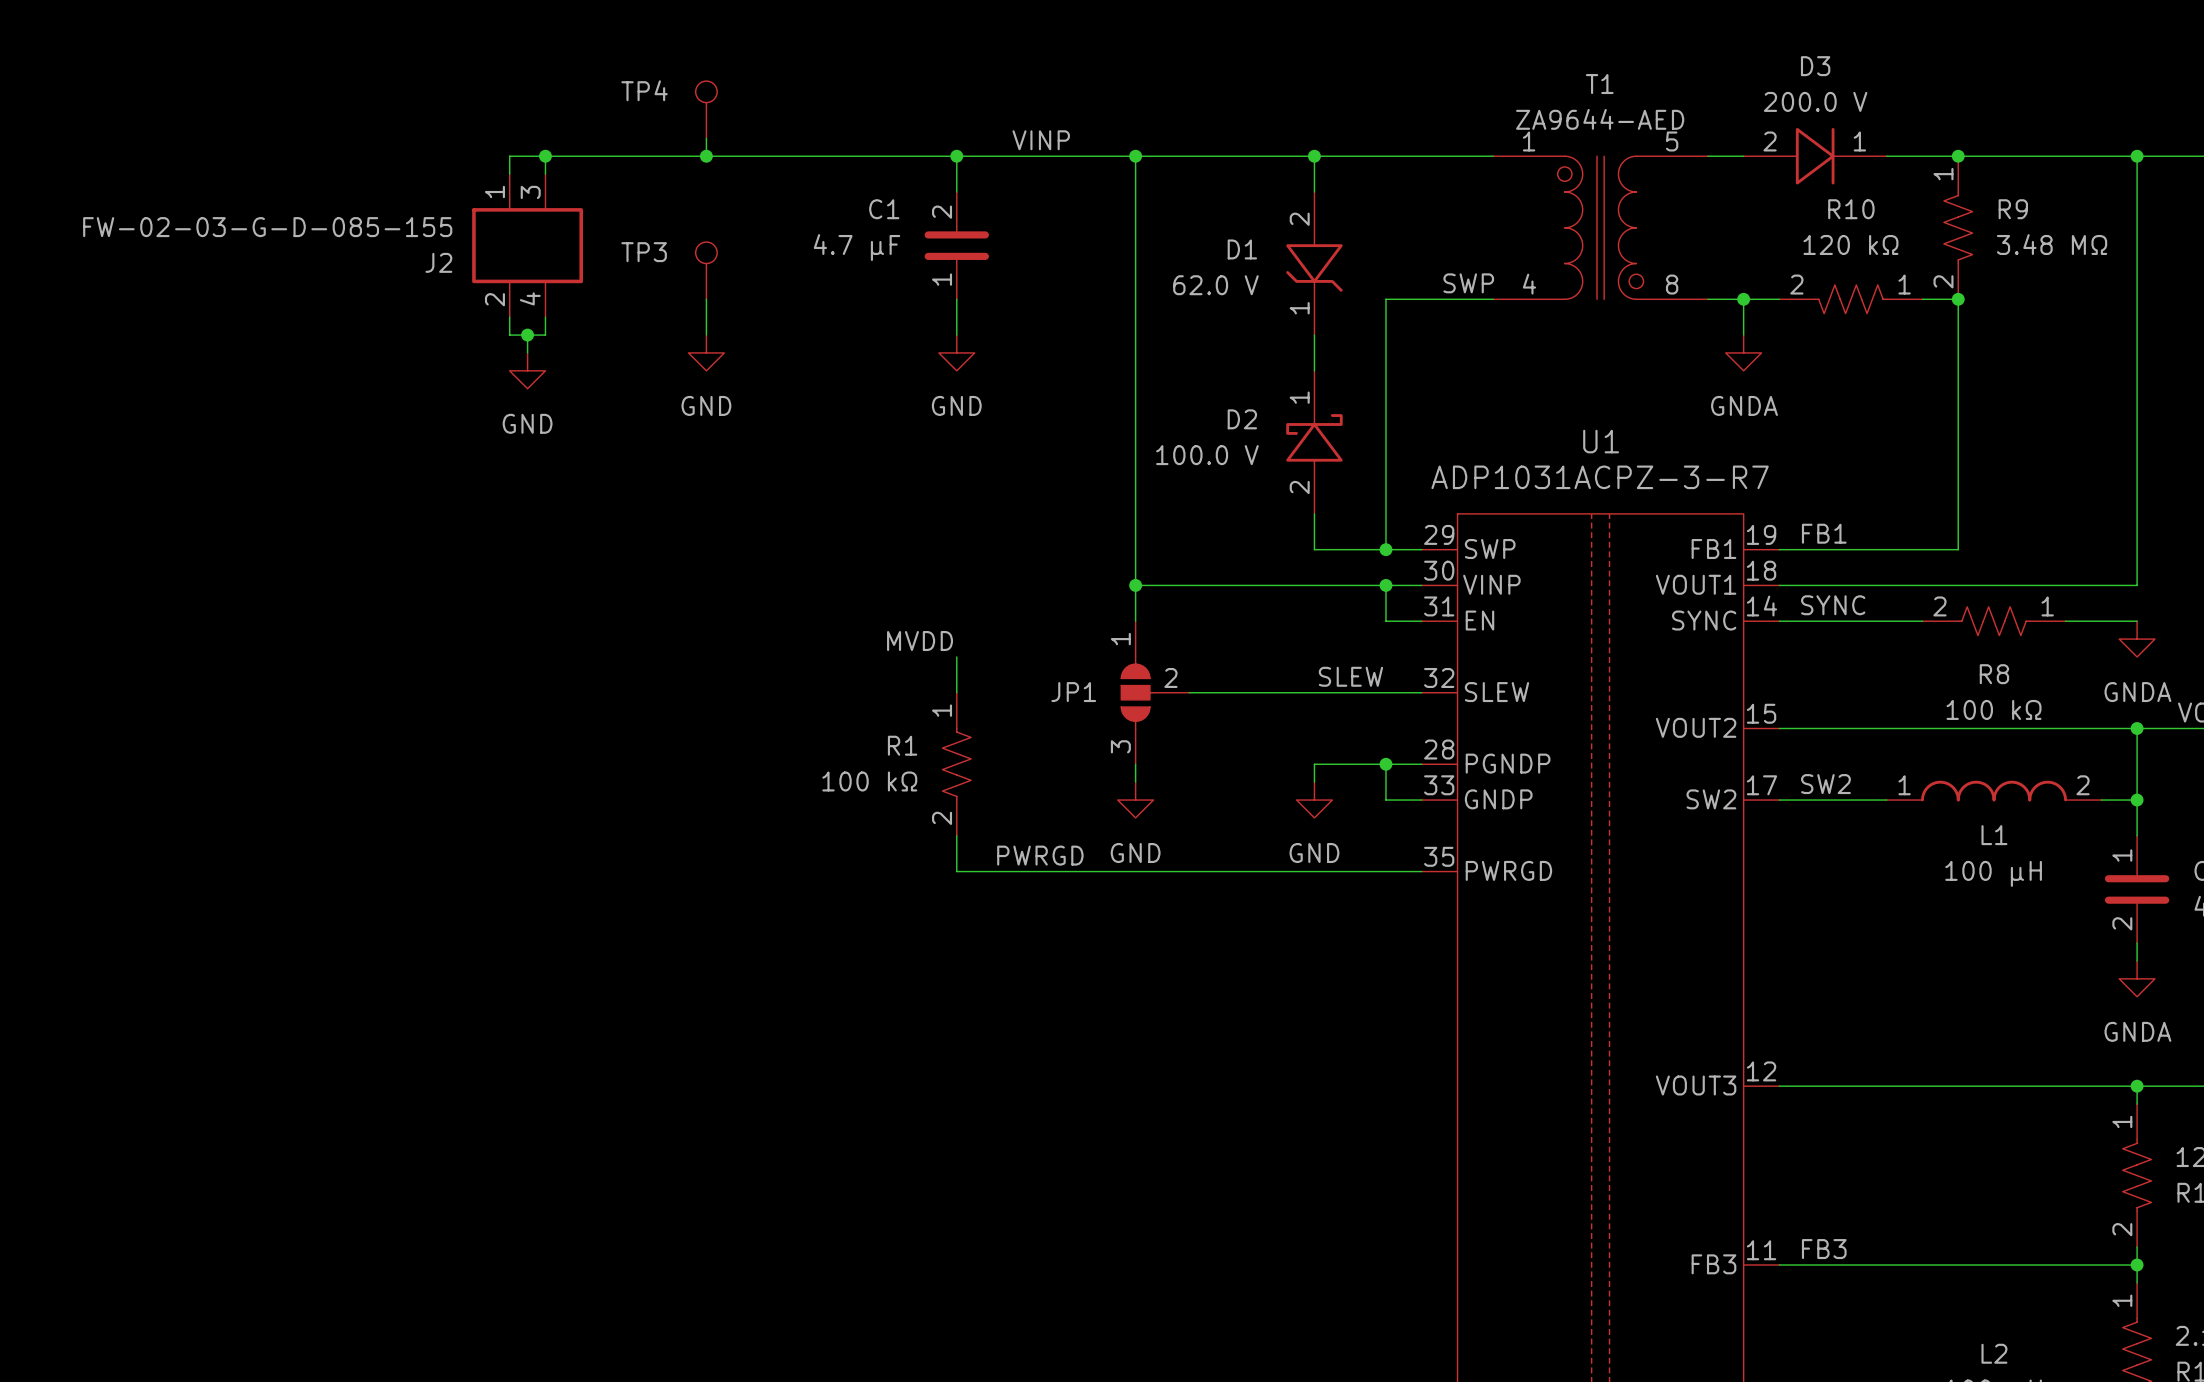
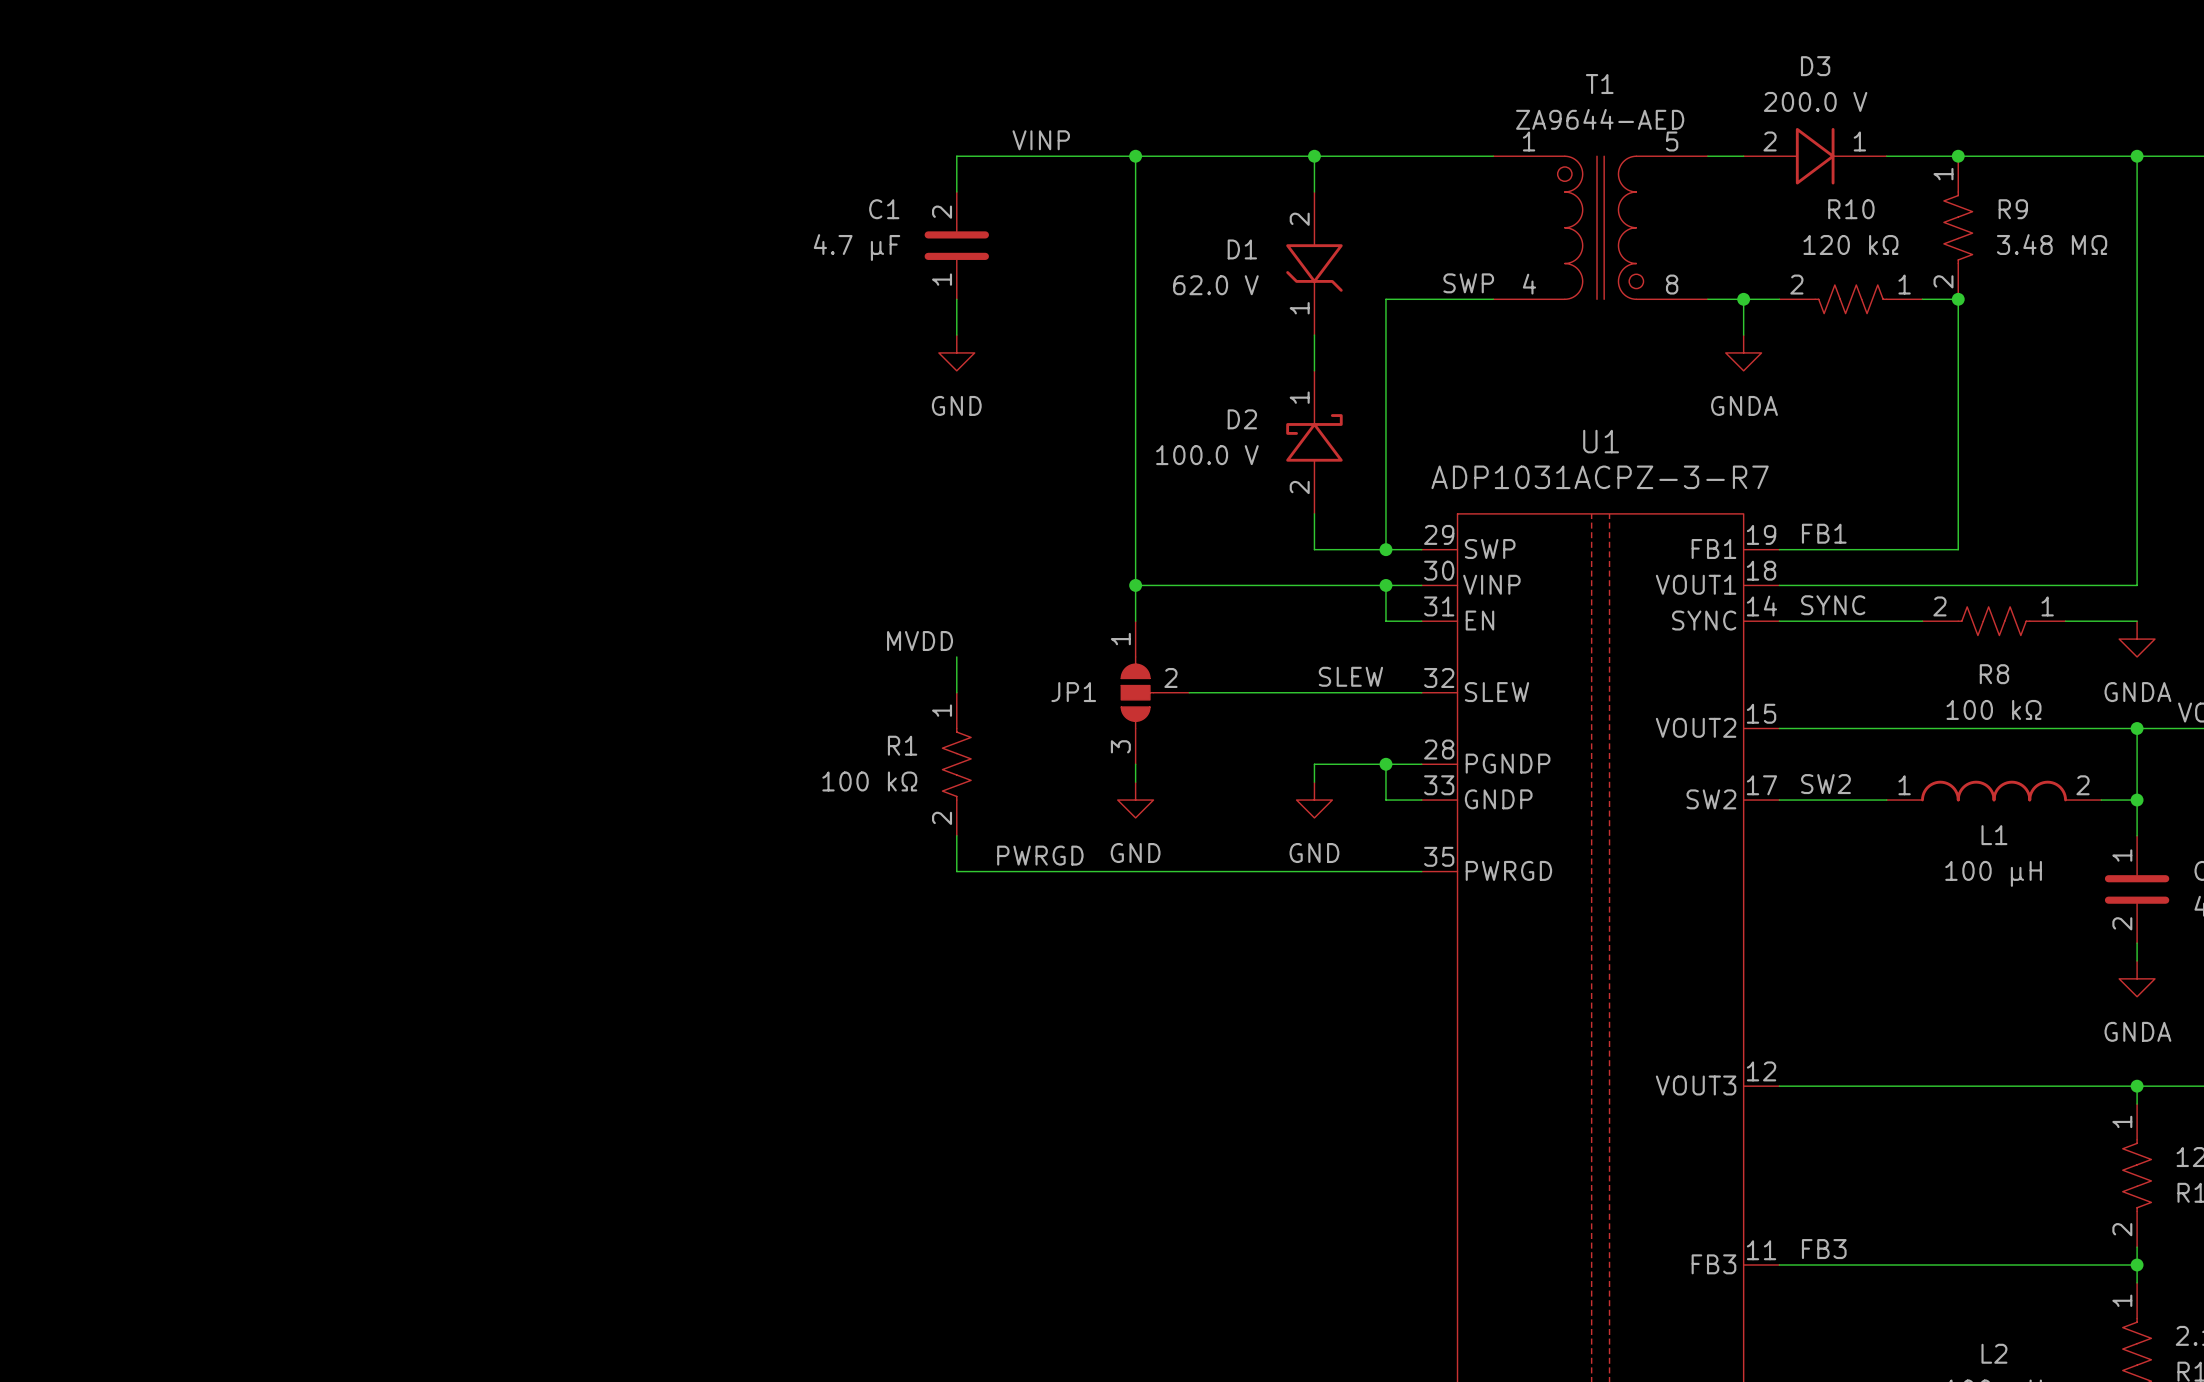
TP4: (706, 109) -> none
wire: (706, 138) (706, 156) -> none
wire: (545, 156) (545, 174) -> none
junction: (545, 156) -> none
junction: (706, 156) -> none
wire: (956, 156) (509, 156) (509, 174) -> none
junction: (956, 156) -> none
J2: FW-02-03-G-D-085-155 (527, 245) -> none
TP3: (706, 270) -> none
wire: (706, 299) (706, 335) -> none
wire: (509, 317) (509, 335) (545, 335) (545, 317) -> none
wire: (527, 335) (527, 352) -> none
junction: (527, 335) -> none
power symbol: GND (706, 352) -> none
power symbol: GND (527, 370) -> none

